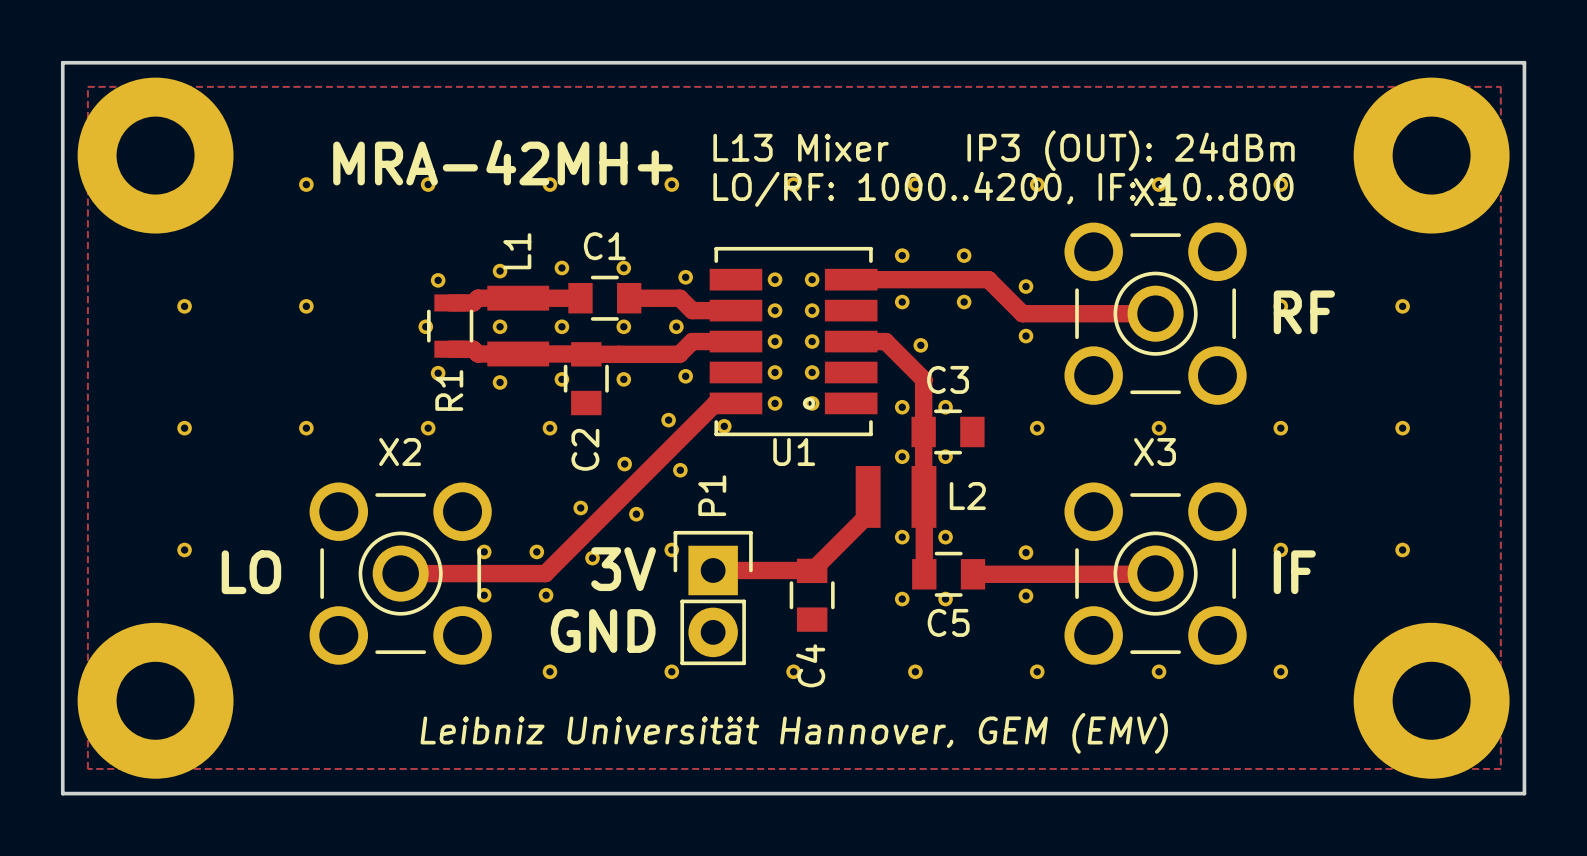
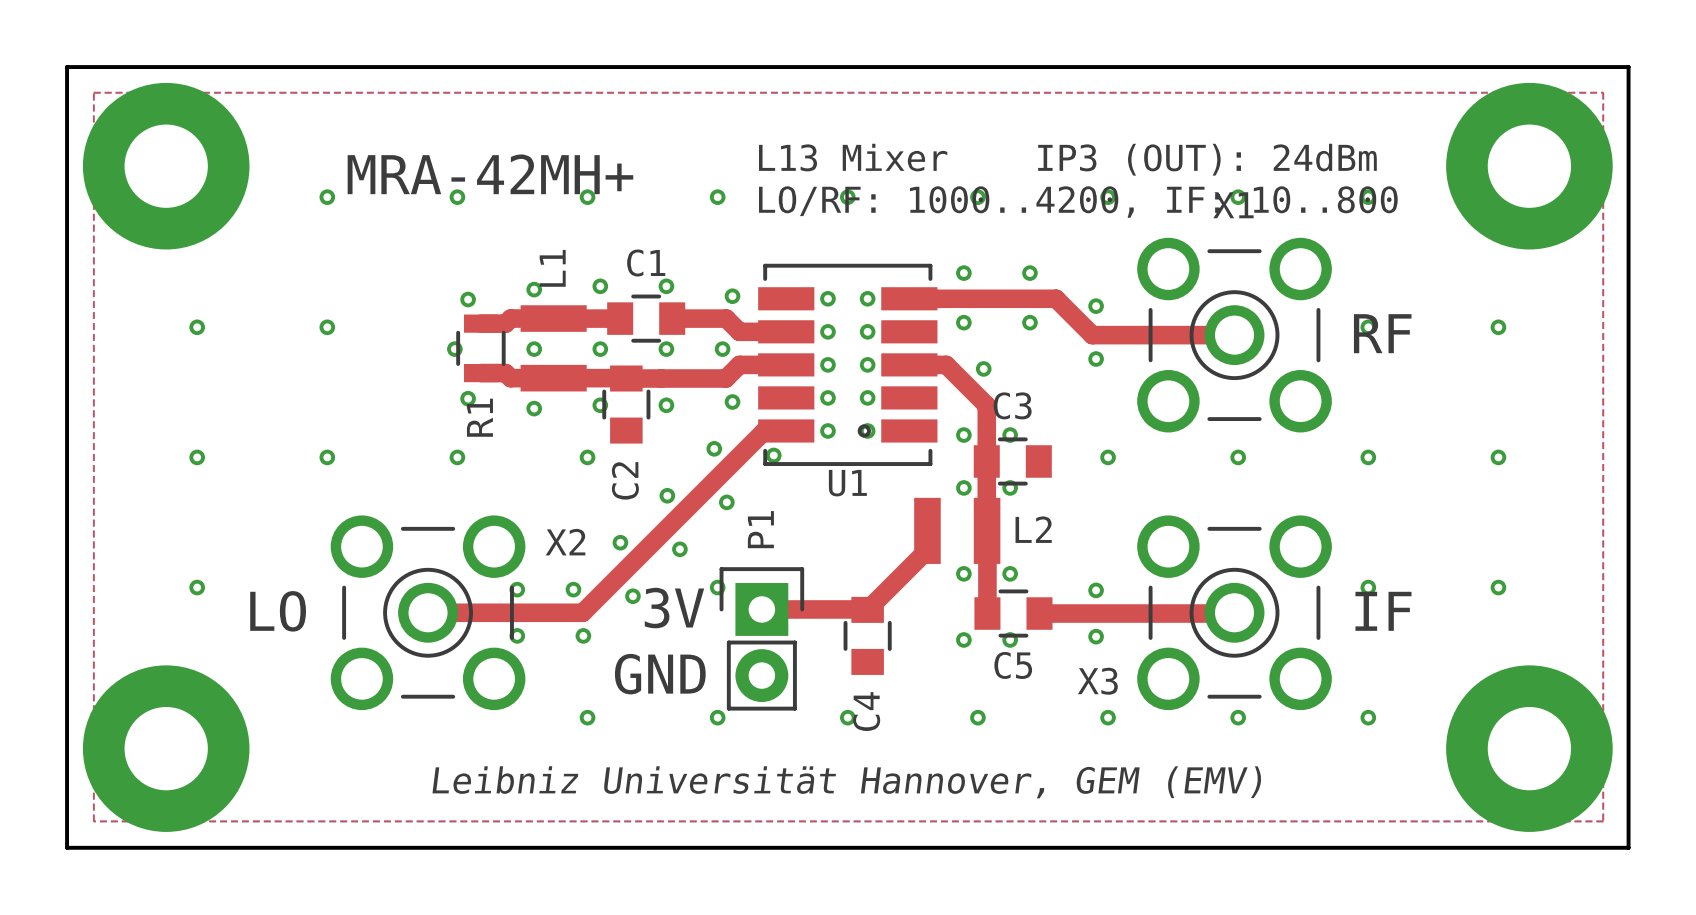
X2 name position: X2 (400, 452) -> X2 (565, 542)
X3 name position: X3 (1155, 452) -> X3 (1097, 681)

